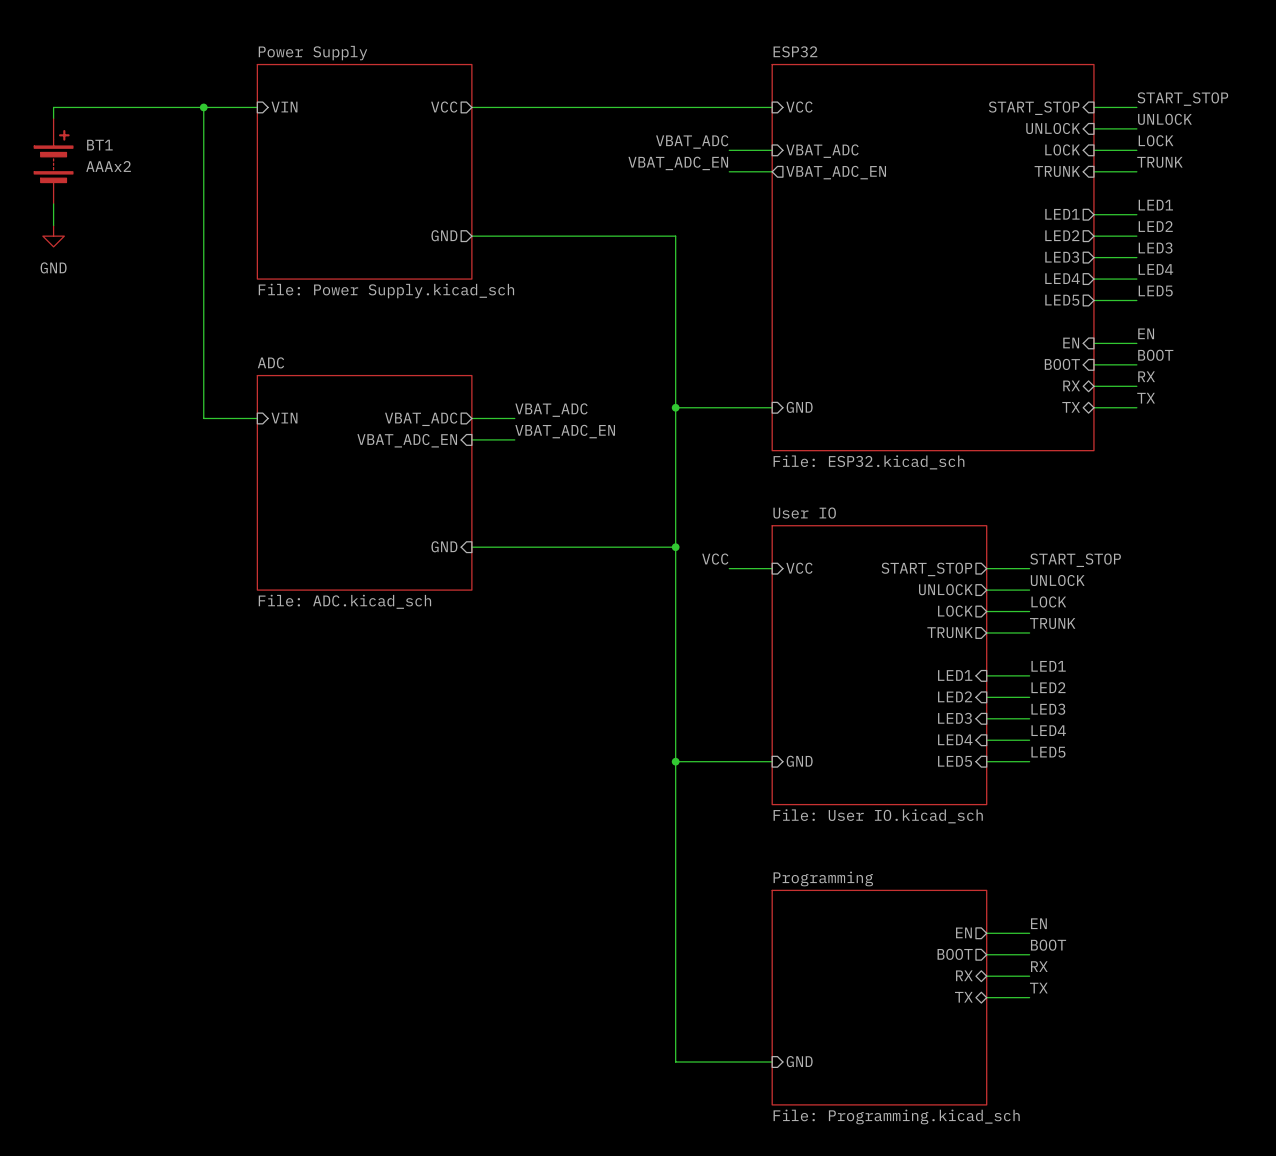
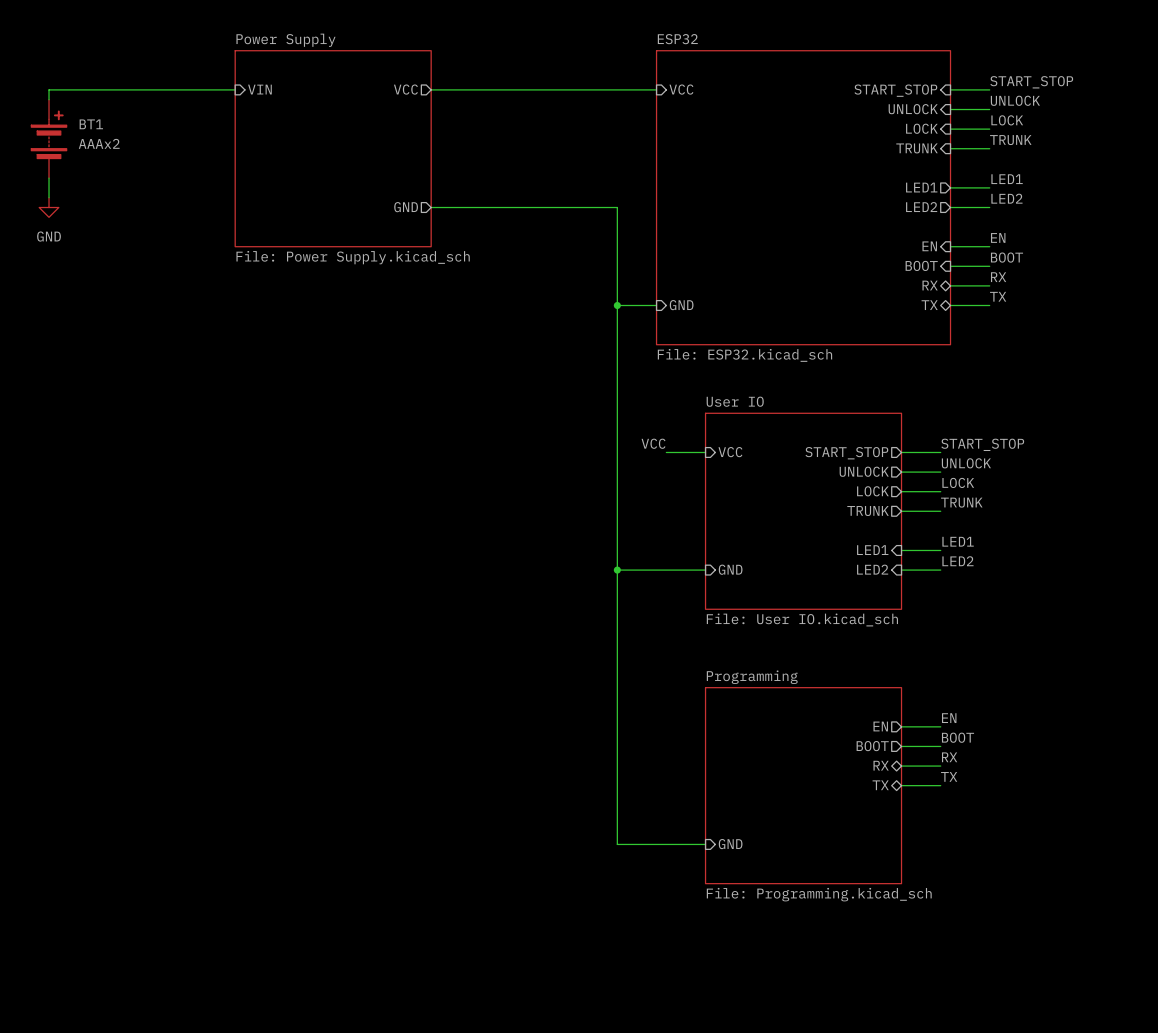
sheet ESP32 name position: ESP32 (795, 51) -> ESP32 (677, 39)
sheet ESP32 shape: [771, 63, 1095, 452] -> [655, 50, 952, 346]
label position: START_STOP (1182, 99) -> START_STOP (1031, 82)
wire: (203, 107) (203, 418) (257, 418) -> none
junction: (203, 107) -> none
wire: (718, 107) (772, 107) -> none
sheet pin position: VCC (799, 107) -> VCC (681, 89)
wire: (1093, 107) (1136, 107) -> (950, 89) (989, 89)
sheet pin position: START_STOP (1034, 108) -> START_STOP (895, 90)
label position: UNLOCK (1164, 119) -> UNLOCK (1015, 100)
sheet pin position: UNLOCK (1053, 128) -> UNLOCK (913, 109)
wire: (1093, 128) (1136, 128) -> (950, 109) (989, 109)
label position: LOCK (1156, 140) -> LOCK (1007, 120)
label: VBAT_ADC (692, 141) -> none
sheet pin position: LOCK (1062, 149) -> LOCK (921, 128)
wire: (729, 150) (772, 150) -> none
wire: (1093, 150) (1136, 150) -> (950, 129) (989, 129)
sheet pin: VBAT_ADC (822, 151) -> none
label position: TRUNK (1159, 162) -> TRUNK (1010, 140)
label: VBAT_ADC_EN (678, 163) -> none
wire: (729, 171) (772, 171) -> (617, 305) (656, 305)
sheet pin position: TRUNK (1057, 171) -> TRUNK (917, 148)
wire: (1093, 171) (1136, 171) -> (950, 148) (989, 148)
sheet pin: VBAT_ADC_EN (836, 172) -> none
label position: LED1 (1155, 205) -> LED1 (1007, 179)
sheet pin position: LED1 (1062, 214) -> LED1 (921, 187)
wire: (1093, 214) (1136, 214) -> (950, 187) (989, 187)
label position: LED2 (1155, 226) -> LED2 (1006, 198)
sheet pin position: LED2 (1062, 235) -> LED2 (921, 207)
wire: (1093, 236) (1136, 236) -> (950, 207) (989, 207)
label: LED3 (1155, 248) -> none
sheet pin: LED3 (1062, 257) -> none
wire: (1093, 257) (1136, 257) -> none
label: LED4 (1155, 269) -> none
sheet pin: LED4 (1062, 278) -> none
wire: (1093, 279) (1136, 279) -> (950, 246) (989, 246)
label: LED5 (1155, 291) -> none
sheet pin: LED5 (1062, 300) -> none
wire: (1093, 300) (1136, 300) -> (950, 266) (989, 266)
label position: EN (1146, 333) -> EN (998, 237)
junction: none -> (617, 305)
sheet pin position: EN (1071, 343) -> EN (929, 246)
wire: (1093, 343) (1136, 343) -> (950, 305) (989, 305)
label position: BOOT (1155, 355) -> BOOT (1007, 257)
sheet pin position: BOOT (1062, 364) -> BOOT (921, 265)
wire: (1093, 364) (1136, 364) -> none
label position: RX (1146, 376) -> RX (998, 277)
sheet pin position: RX (1071, 385) -> RX (930, 285)
wire: (1093, 386) (1136, 386) -> (950, 285) (989, 285)
label position: TX (1146, 398) -> TX (998, 296)
wire: (675, 407) (772, 407) -> none
junction: (675, 407) -> none
sheet pin position: GND (799, 407) -> GND (681, 305)
sheet pin position: TX (1071, 407) -> TX (929, 305)
wire: (1093, 407) (1136, 407) -> none
label: VBAT_ADC (551, 410) -> none
sheet pin: VIN (284, 418) -> none
wire: (471, 418) (514, 418) -> none
sheet pin: VBAT_ADC (421, 419) -> none
label: VBAT_ADC_EN (565, 431) -> none
wire: (471, 439) (514, 439) -> none
sheet pin: VBAT_ADC_EN (407, 440) -> none
sheet ESP32 value position: File: ESP32.kicad_sch (868, 462) -> File: ESP32.kicad_sch (744, 355)
sheet ADC: File: ADC.kicad_sch (364, 482) -> none
label: none -> START_STOP (982, 444)
sheet pin: none -> START_STOP (846, 453)
label: none -> LOCK (958, 482)
sheet pin: GND (444, 546) -> none
sheet pin: none -> LOCK (872, 491)
wire: (471, 547) (675, 547) -> none
junction: (675, 547) -> none
label position: VCC (715, 559) -> VCC (653, 443)
label: START_STOP (1075, 560) -> TRUNK (961, 502)
wire: (729, 568) (772, 568) -> (666, 452) (705, 452)
sheet pin position: VCC (799, 568) -> VCC (730, 452)
sheet User IO: none -> File: User IO.kicad_sch (803, 511)
sheet pin: START_STOP (926, 569) -> TRUNK (868, 511)
label position: UNLOCK (1057, 580) -> UNLOCK (966, 463)
sheet pin position: UNLOCK (945, 589) -> UNLOCK (864, 471)
wire: (986, 590) (1029, 590) -> (901, 452) (940, 452)
label: LOCK (1048, 601) -> LED1 (958, 541)
sheet pin shape: output (955, 611) -> input (872, 550)
sheet pin: LOCK (955, 611) -> LED1 (872, 550)
label: TRUNK (1052, 623) -> LED2 (957, 561)
junction: none -> (617, 570)
sheet pin: none -> GND (730, 569)
sheet pin shape: output (950, 632) -> input (872, 569)
sheet pin: TRUNK (950, 632) -> LED2 (872, 569)
sheet User IO: File: User IO.kicad_sch (879, 665) -> none
label: LED1 (1048, 666) -> none
sheet pin: LED1 (955, 675) -> none
wire: (986, 675) (1029, 675) -> (901, 491) (940, 491)
label: LED2 (1048, 687) -> none
sheet pin: LED2 (955, 696) -> none
wire: (986, 697) (1029, 697) -> (901, 472) (940, 472)
label: LED3 (1048, 709) -> none
sheet pin: LED3 (954, 718) -> none
wire: (986, 718) (1029, 718) -> none
label: LED4 (1048, 730) -> none
sheet pin: LED4 (955, 739) -> none
wire: (986, 740) (1029, 740) -> none
label: LED5 (1048, 752) -> none
wire: (675, 761) (772, 761) -> (617, 570) (705, 570)
junction: (675, 761) -> none
sheet pin: GND (799, 761) -> none
sheet pin: LED5 (955, 761) -> none
wire: (986, 761) (1029, 761) -> none
label position: EN (1038, 923) -> EN (949, 718)
sheet pin: none -> GND (730, 844)
sheet pin position: EN (963, 932) -> EN (880, 726)
wire: (675, 933) (675, 1062) (772, 1062) -> (617, 844) (705, 844)
wire: (986, 933) (1029, 933) -> (901, 726) (940, 726)
label position: BOOT (1048, 945) -> BOOT (958, 737)
sheet pin position: BOOT (955, 954) -> BOOT (872, 746)
wire: (986, 954) (1029, 954) -> (901, 746) (940, 746)
label position: RX (1039, 966) -> RX (949, 757)
sheet pin position: RX (964, 975) -> RX (881, 765)
wire: (986, 976) (1029, 976) -> (901, 766) (940, 766)
label position: TX (1038, 988) -> TX (949, 776)
sheet Programming position: (879, 997) -> (803, 785)
sheet pin position: TX (963, 997) -> TX (880, 785)
wire: (986, 997) (1029, 997) -> (901, 785) (940, 785)
sheet pin: GND (799, 1061) -> none

